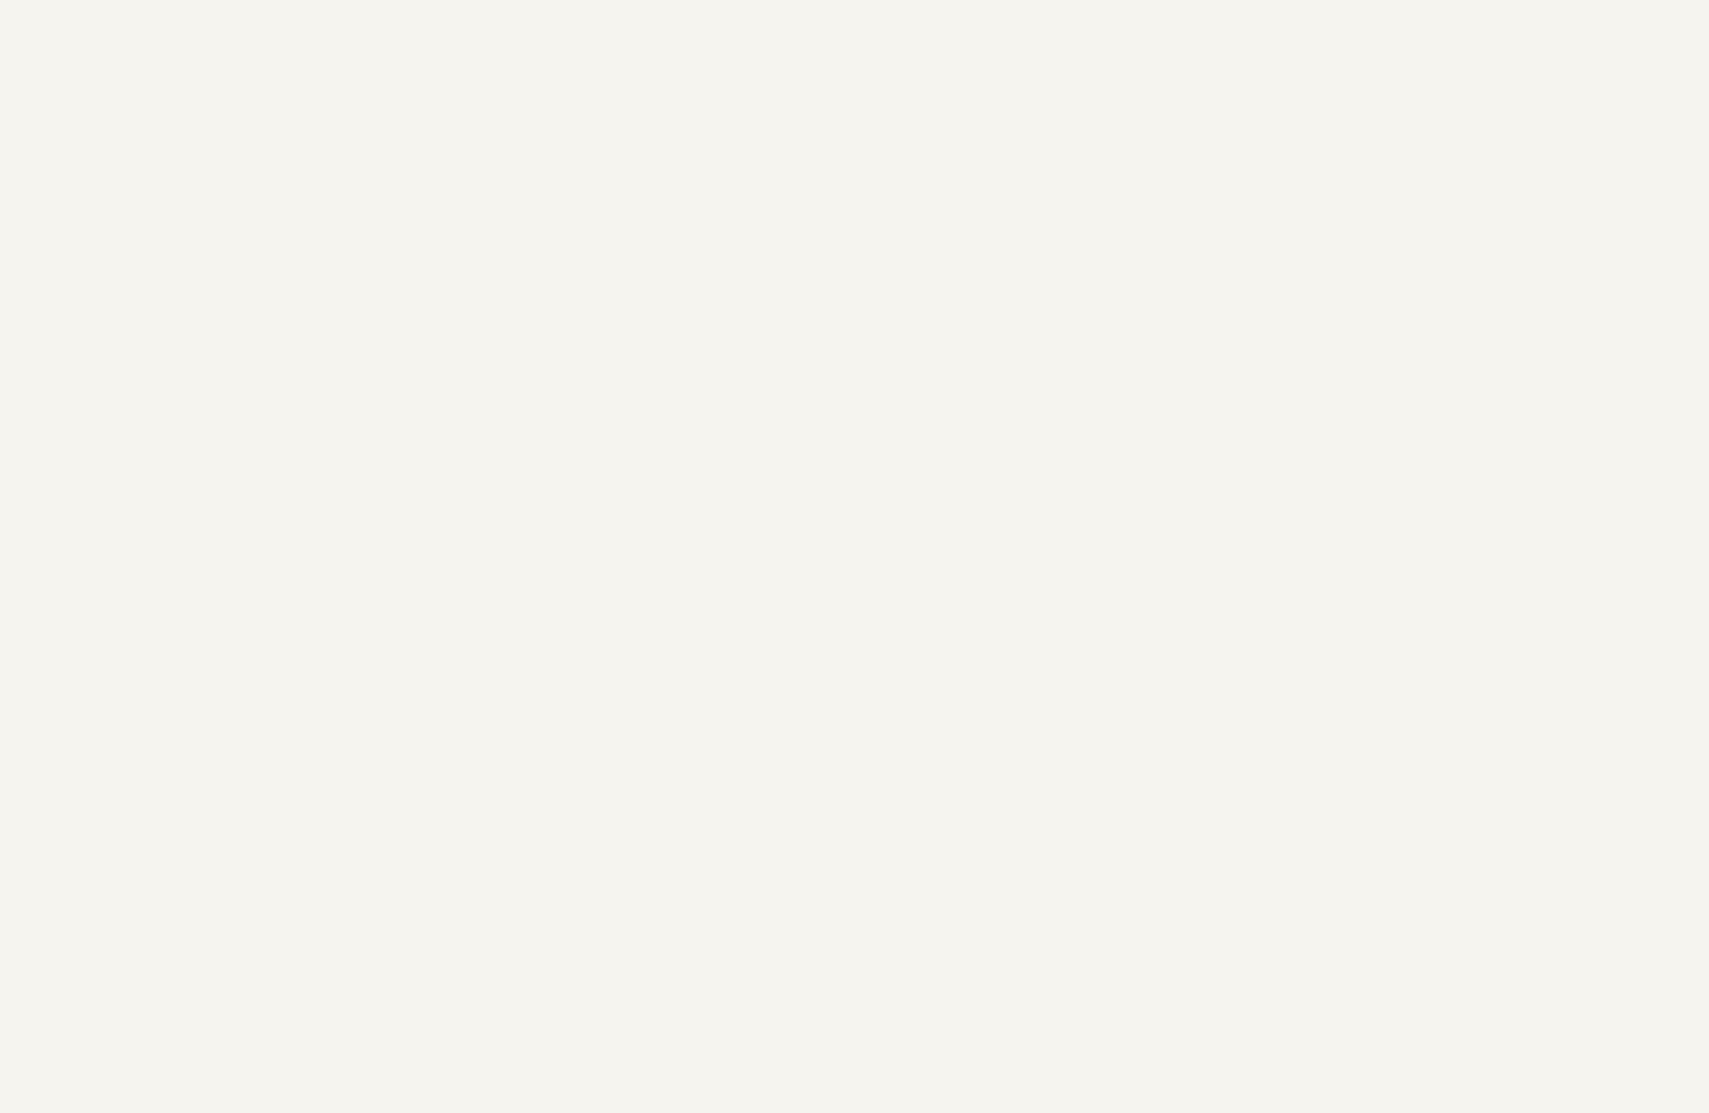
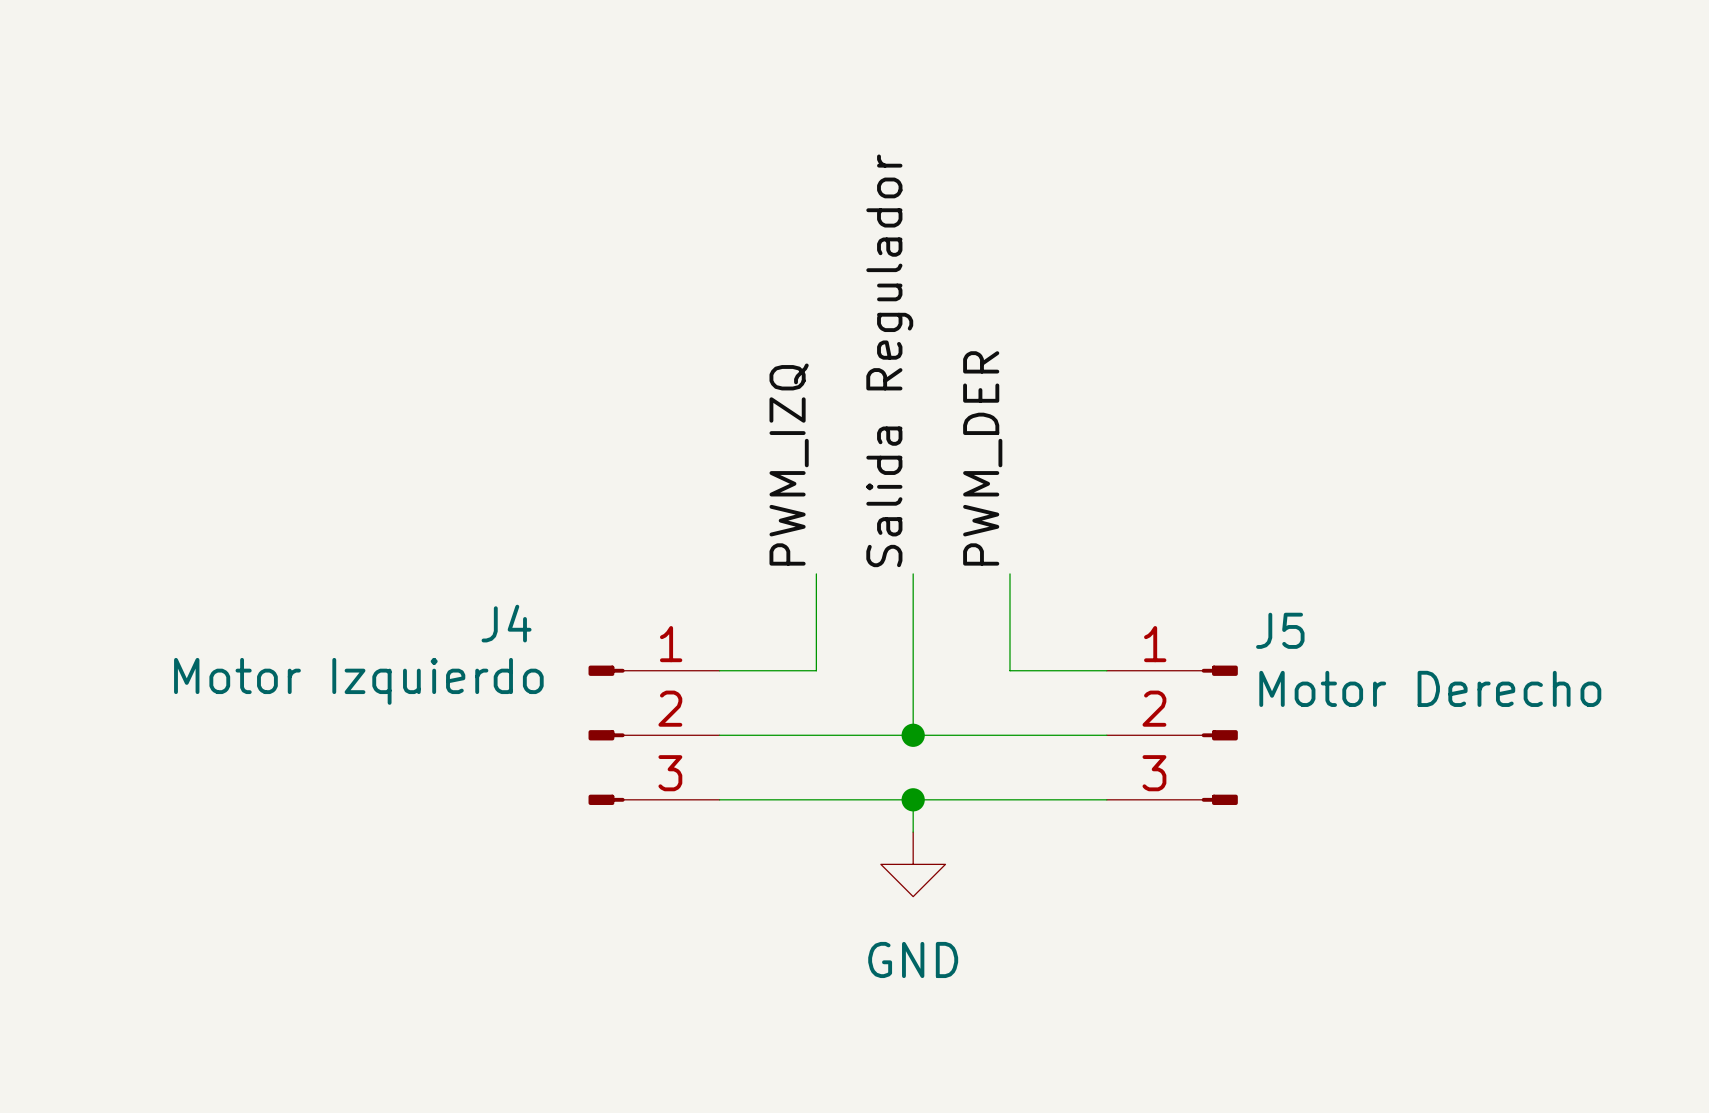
label: none -> Salida Regulador (889, 360)
label: none -> PWM_DER (982, 458)
label: none -> PWM_IZQ (789, 464)
wire: none -> (816, 573) (816, 670) (719, 670)
wire: none -> (913, 573) (913, 735)
wire: none -> (1009, 573) (1009, 670) (1106, 670)
J4: none -> Motor Izquierdo (654, 735)
wire: none -> (719, 735) (1106, 735)
junction: none -> (913, 735)
J5: none -> Motor Derecho (1172, 735)
wire: none -> (719, 799) (1106, 799)
wire: none -> (913, 799) (913, 832)
junction: none -> (913, 799)
power symbol: none -> GND (913, 864)

